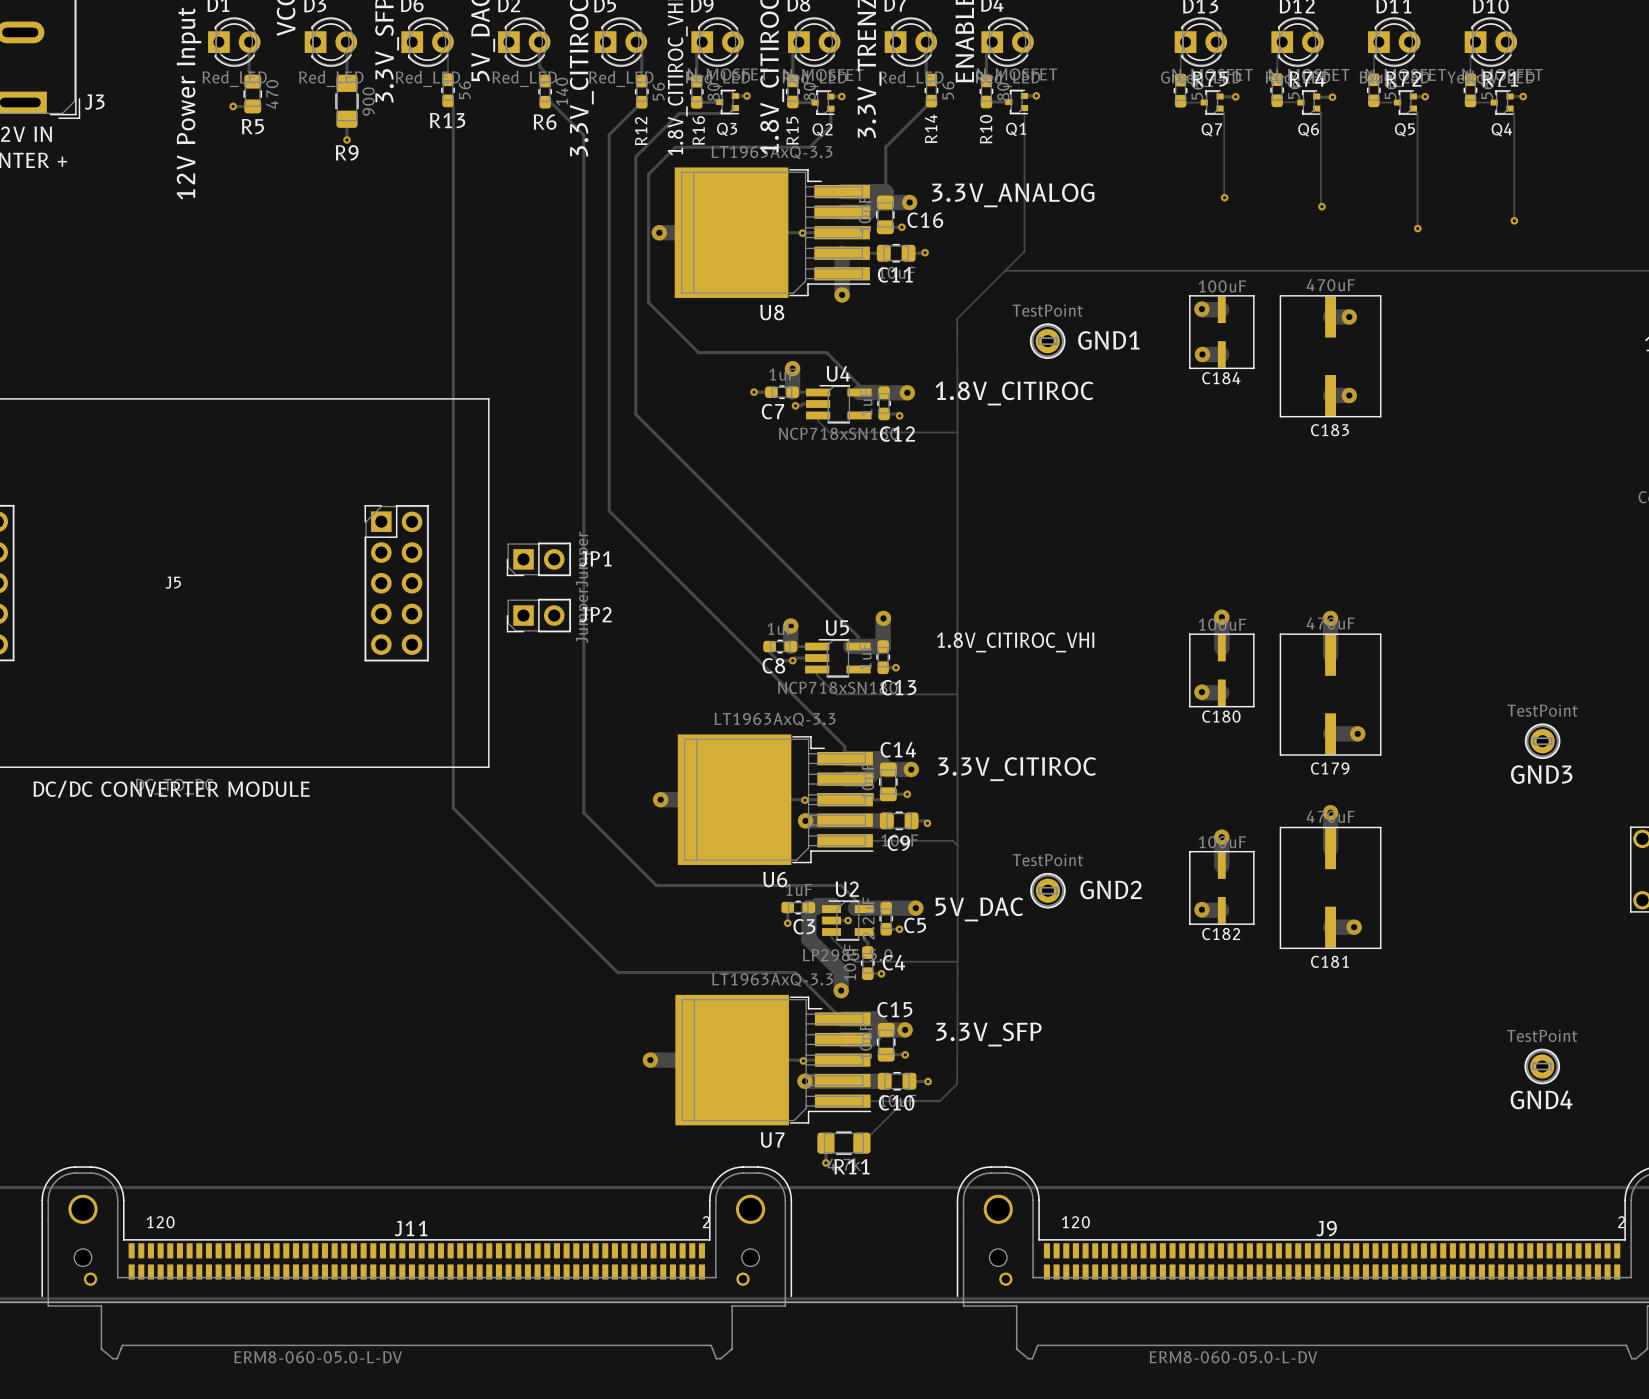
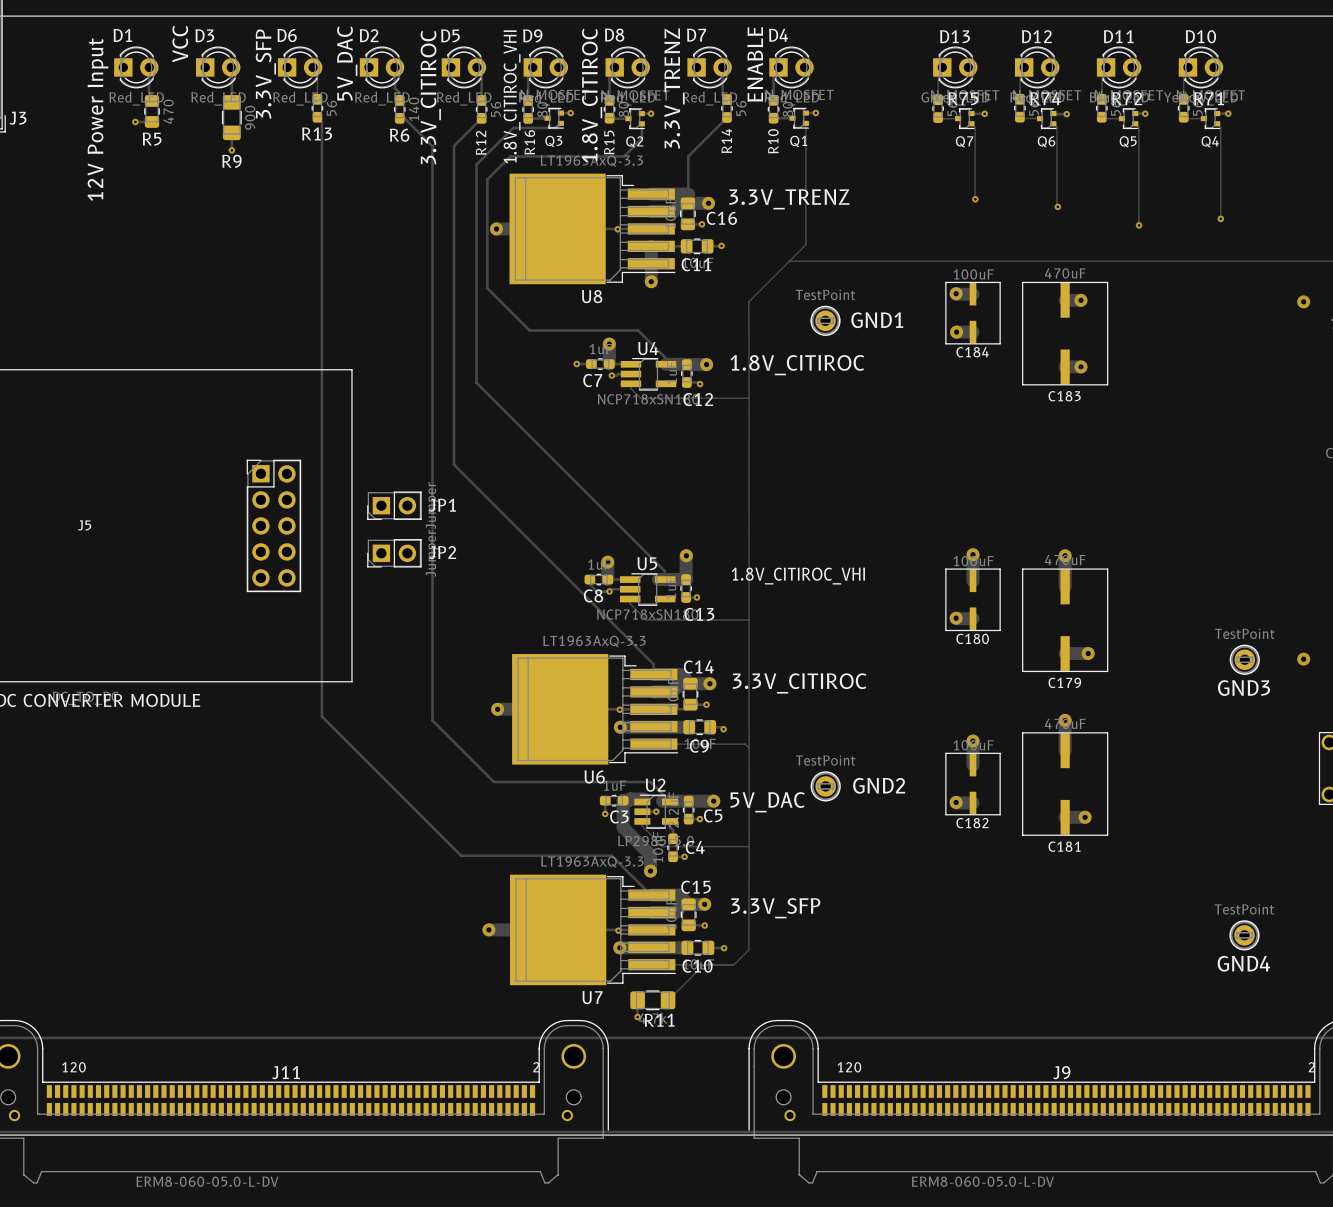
text: 3.3V_ANALOG (1013, 195) -> 3.3V_TRENZ (789, 199)
via: none -> (1303, 301)
via: none -> (1303, 659)

